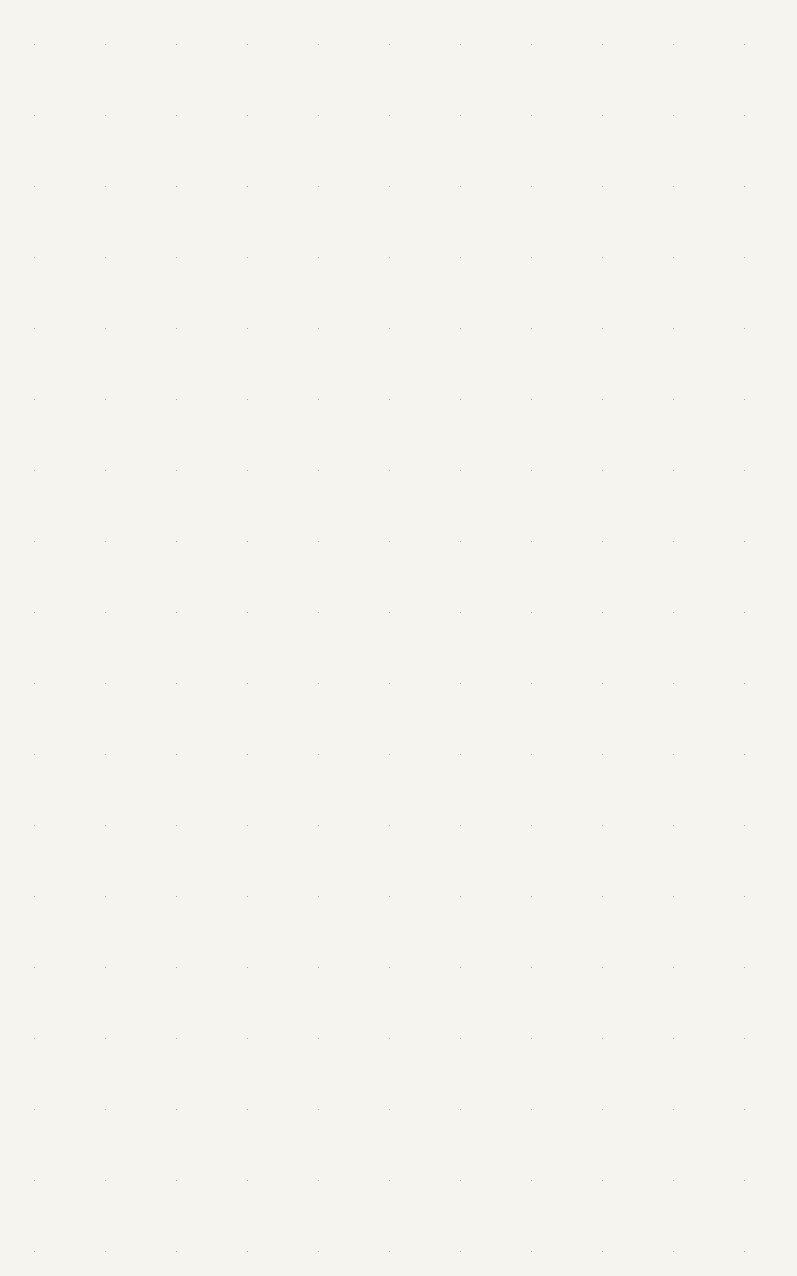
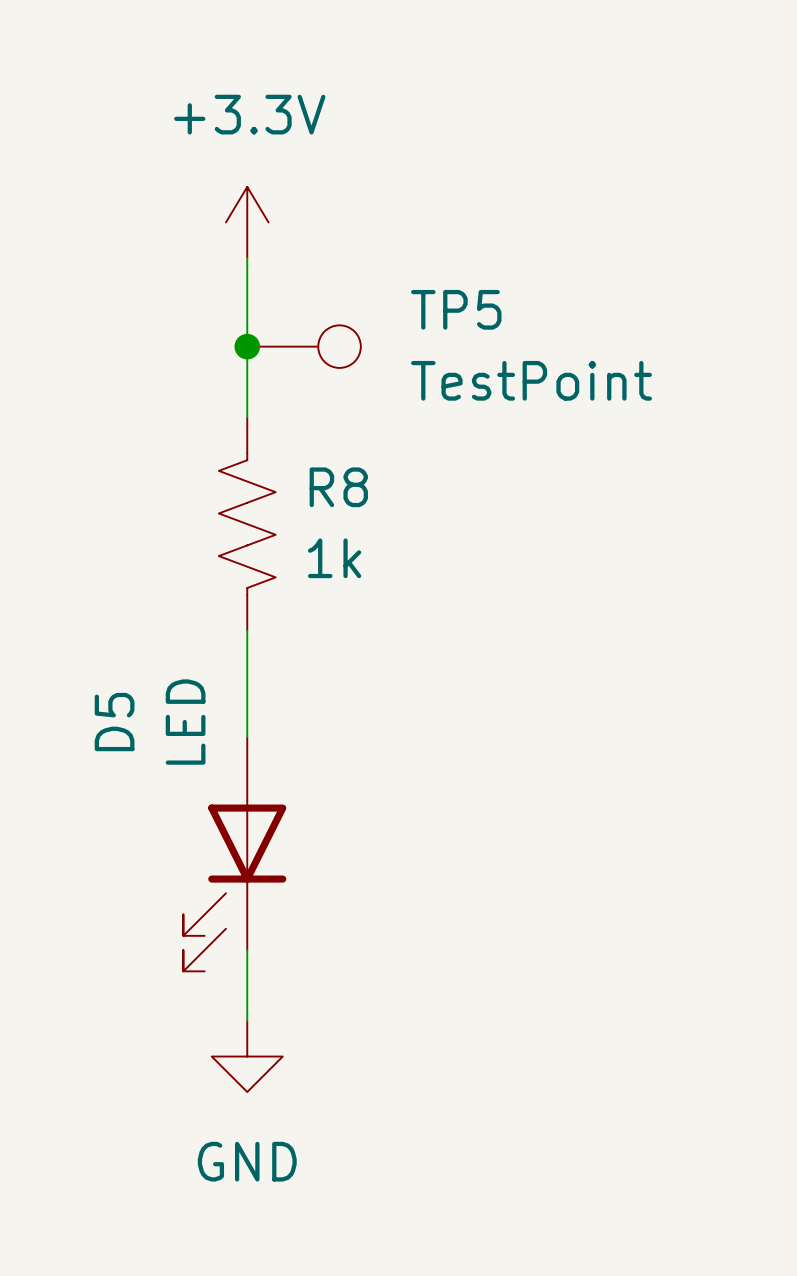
power symbol: none -> +3.3V (247, 222)
wire: none -> (247, 257) (247, 417)
junction: none -> (247, 346)
TP5: none -> TestPoint (304, 346)
R8: none -> 1k (247, 524)
wire: none -> (247, 630) (247, 737)
D5: none -> LED (234, 854)
wire: none -> (247, 950) (247, 1021)
power symbol: none -> GND (247, 1056)

